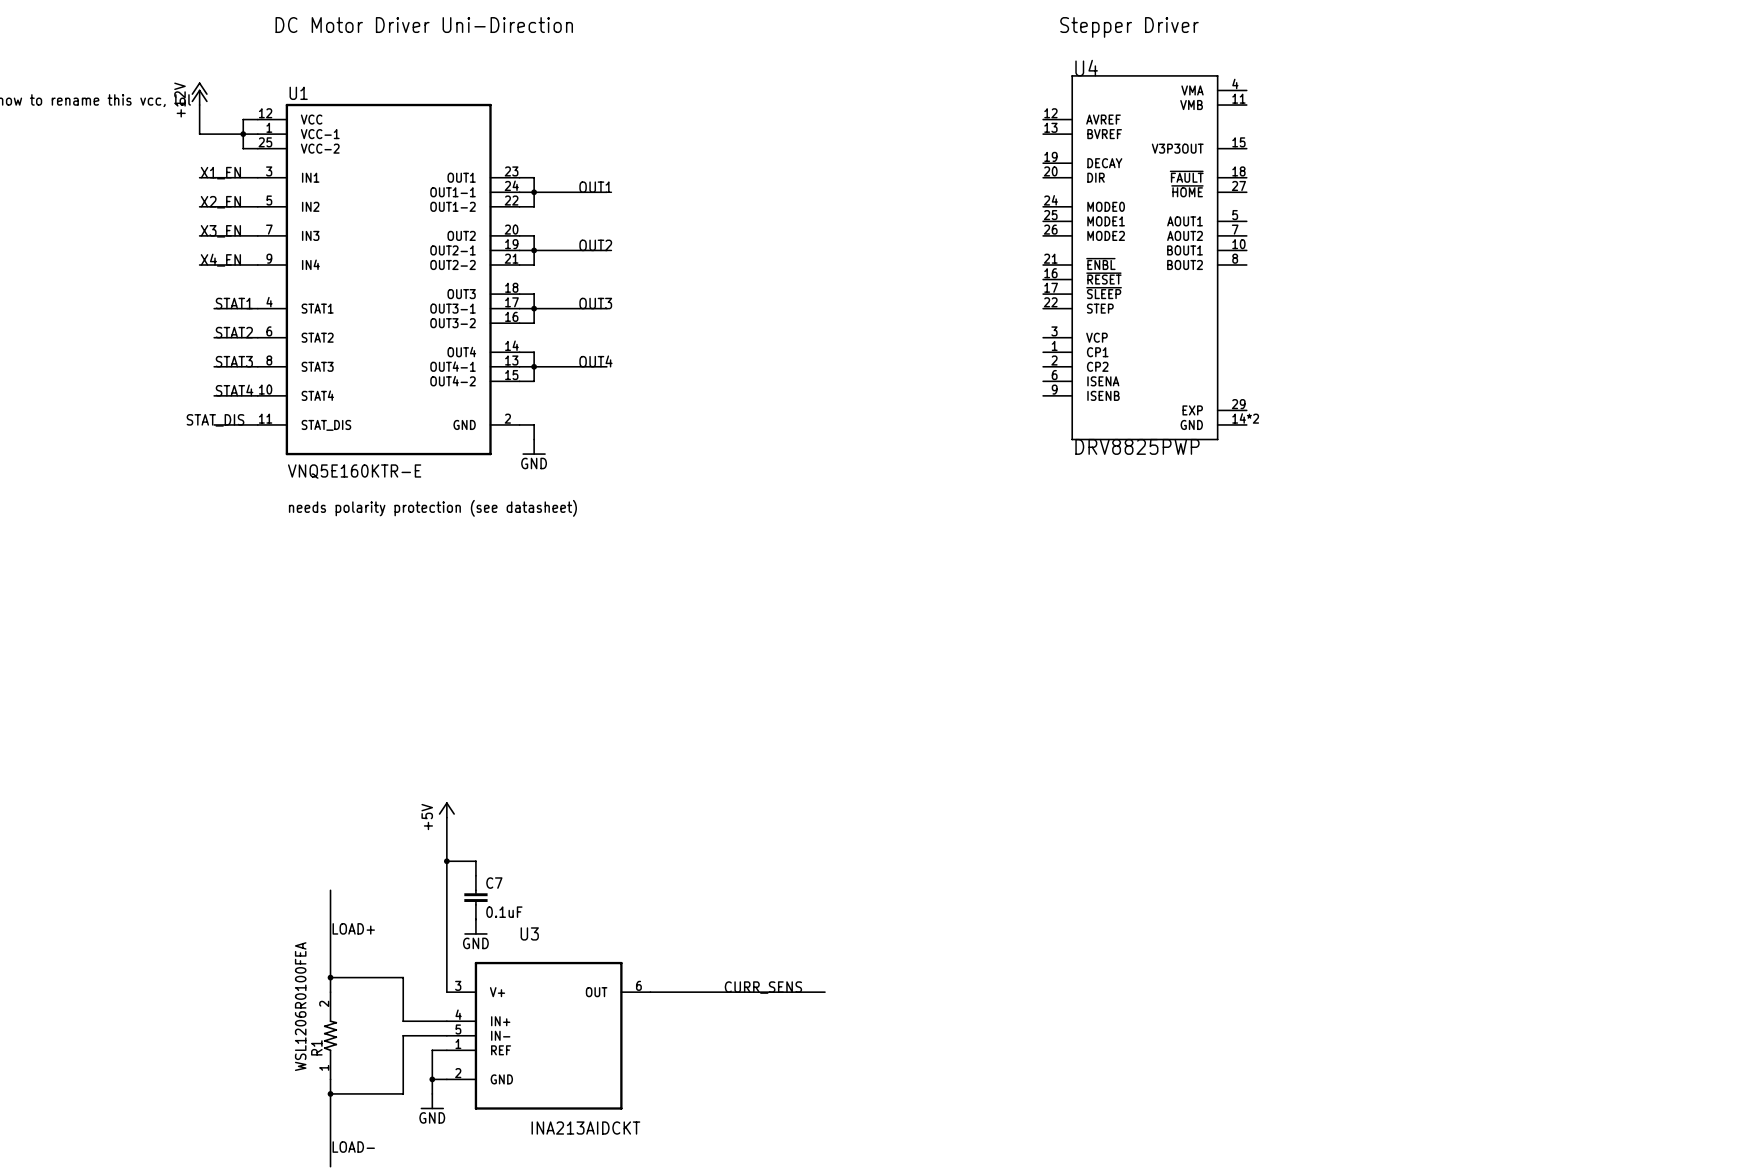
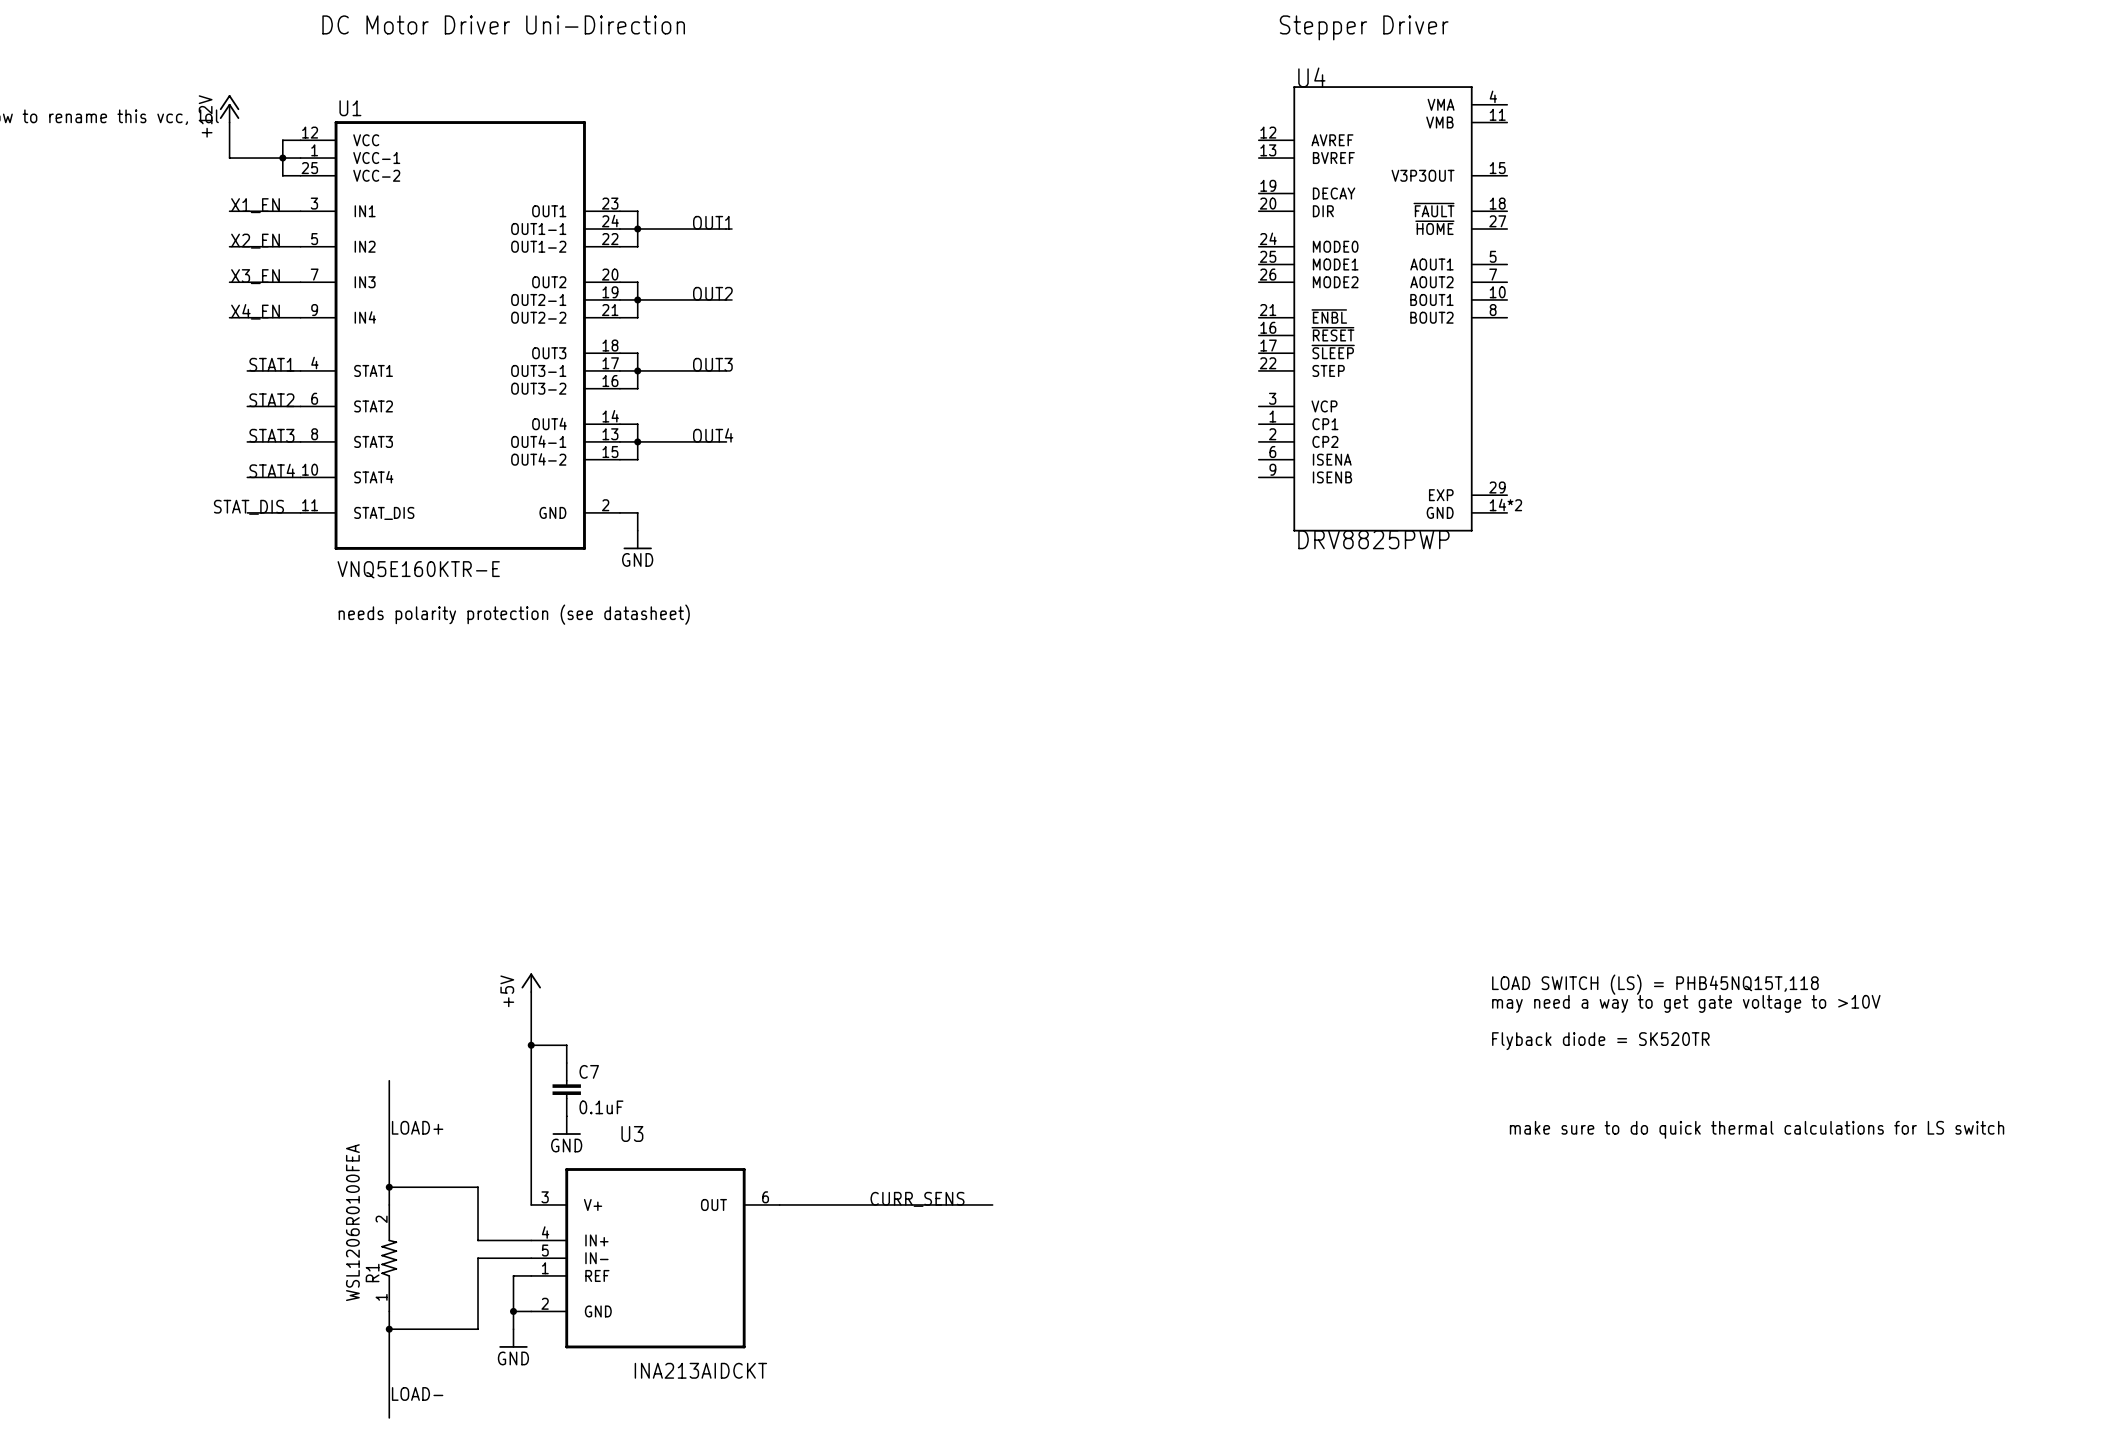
text: none -> LOAD SWITCH (LS) = PHB45NQ15T,118 (1655, 984)
text: none -> may need a way to get gate voltage to >10V (1686, 1003)
text: none -> Flyback diode = SK520TR (1600, 1041)
text: none -> make sure to do quick thermal calculations for LS switch (1757, 1129)

